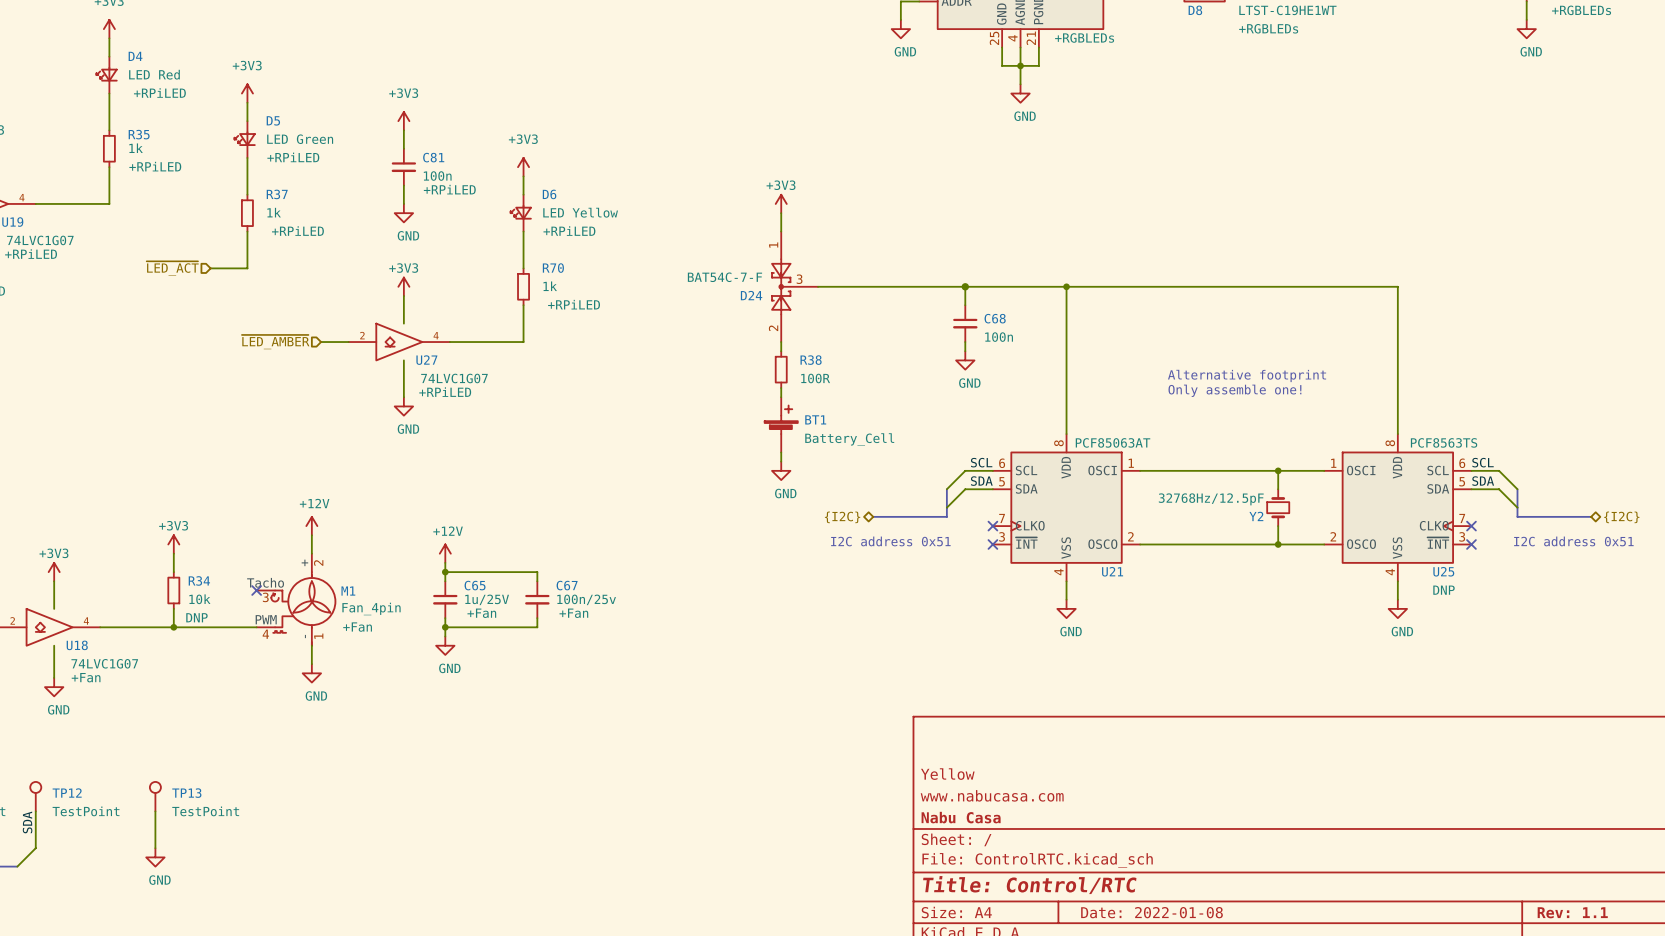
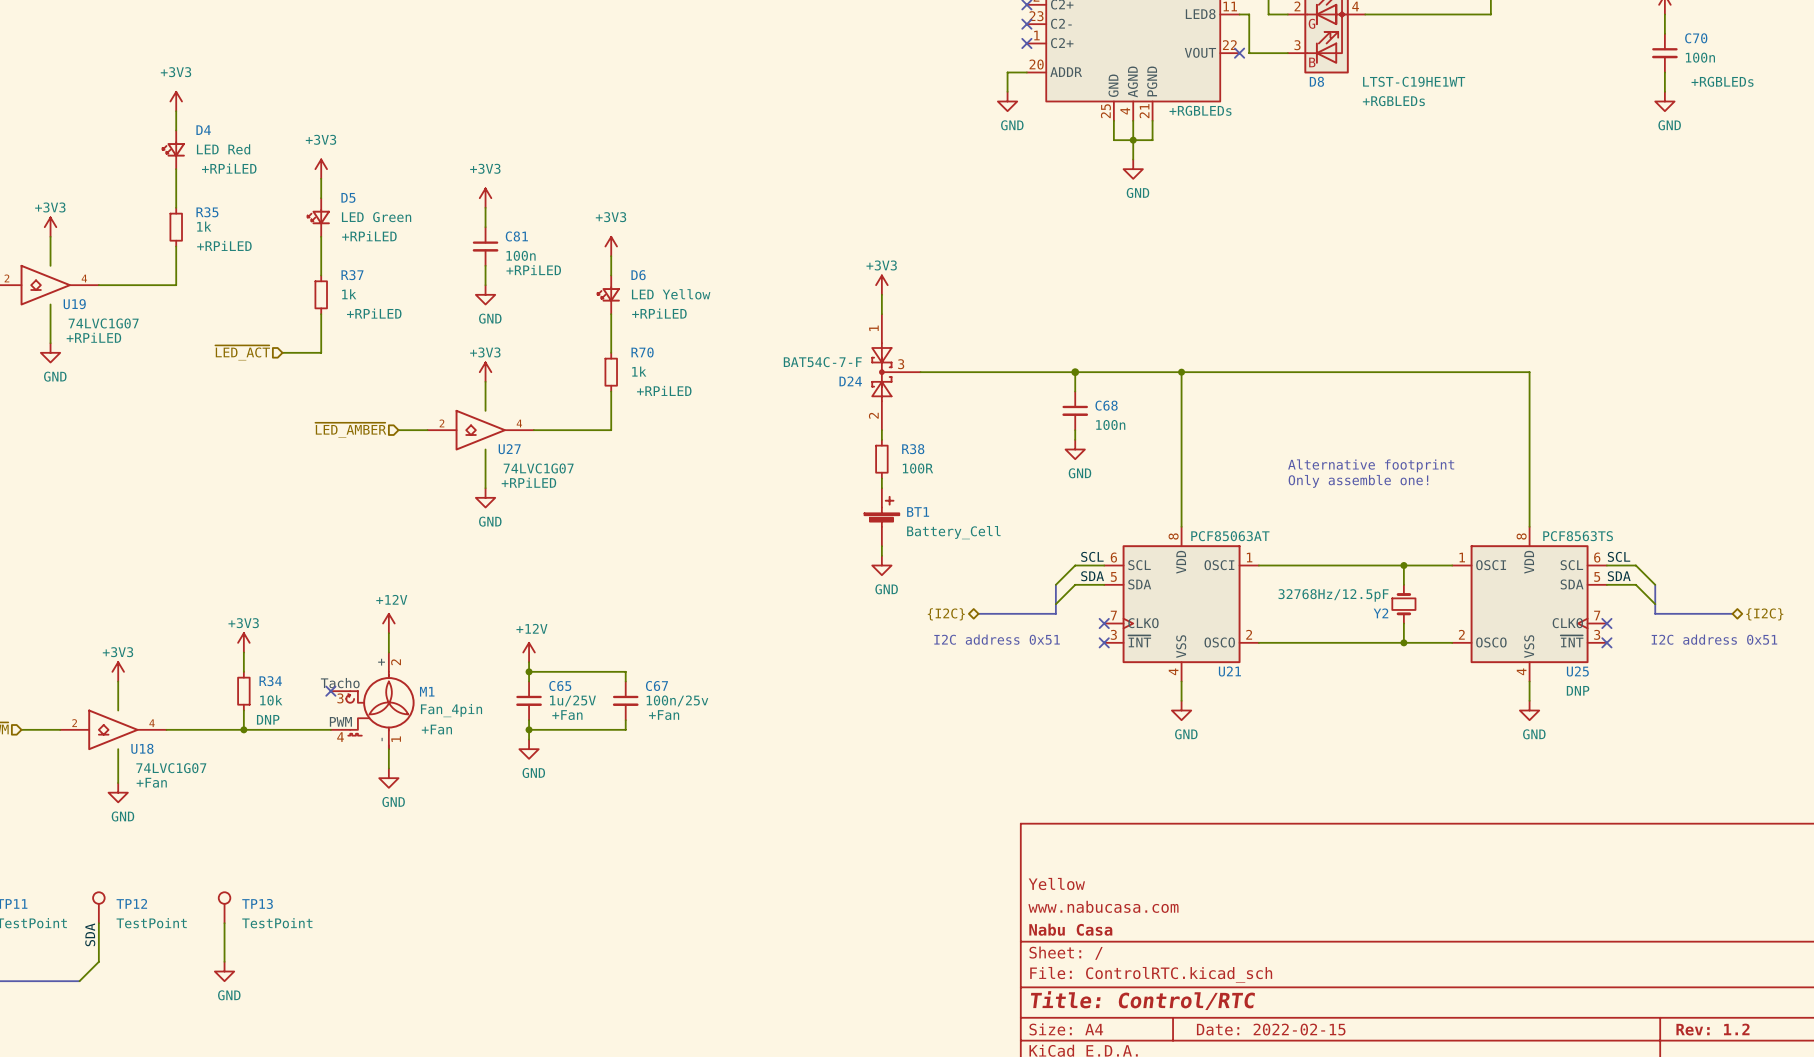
title block: Date: 2022-01-08 (1151, 912) -> Date: 2022-02-15 (1271, 1029)
title block: Rev: 1.1 (1572, 912) -> Rev: 1.2 (1712, 1029)

